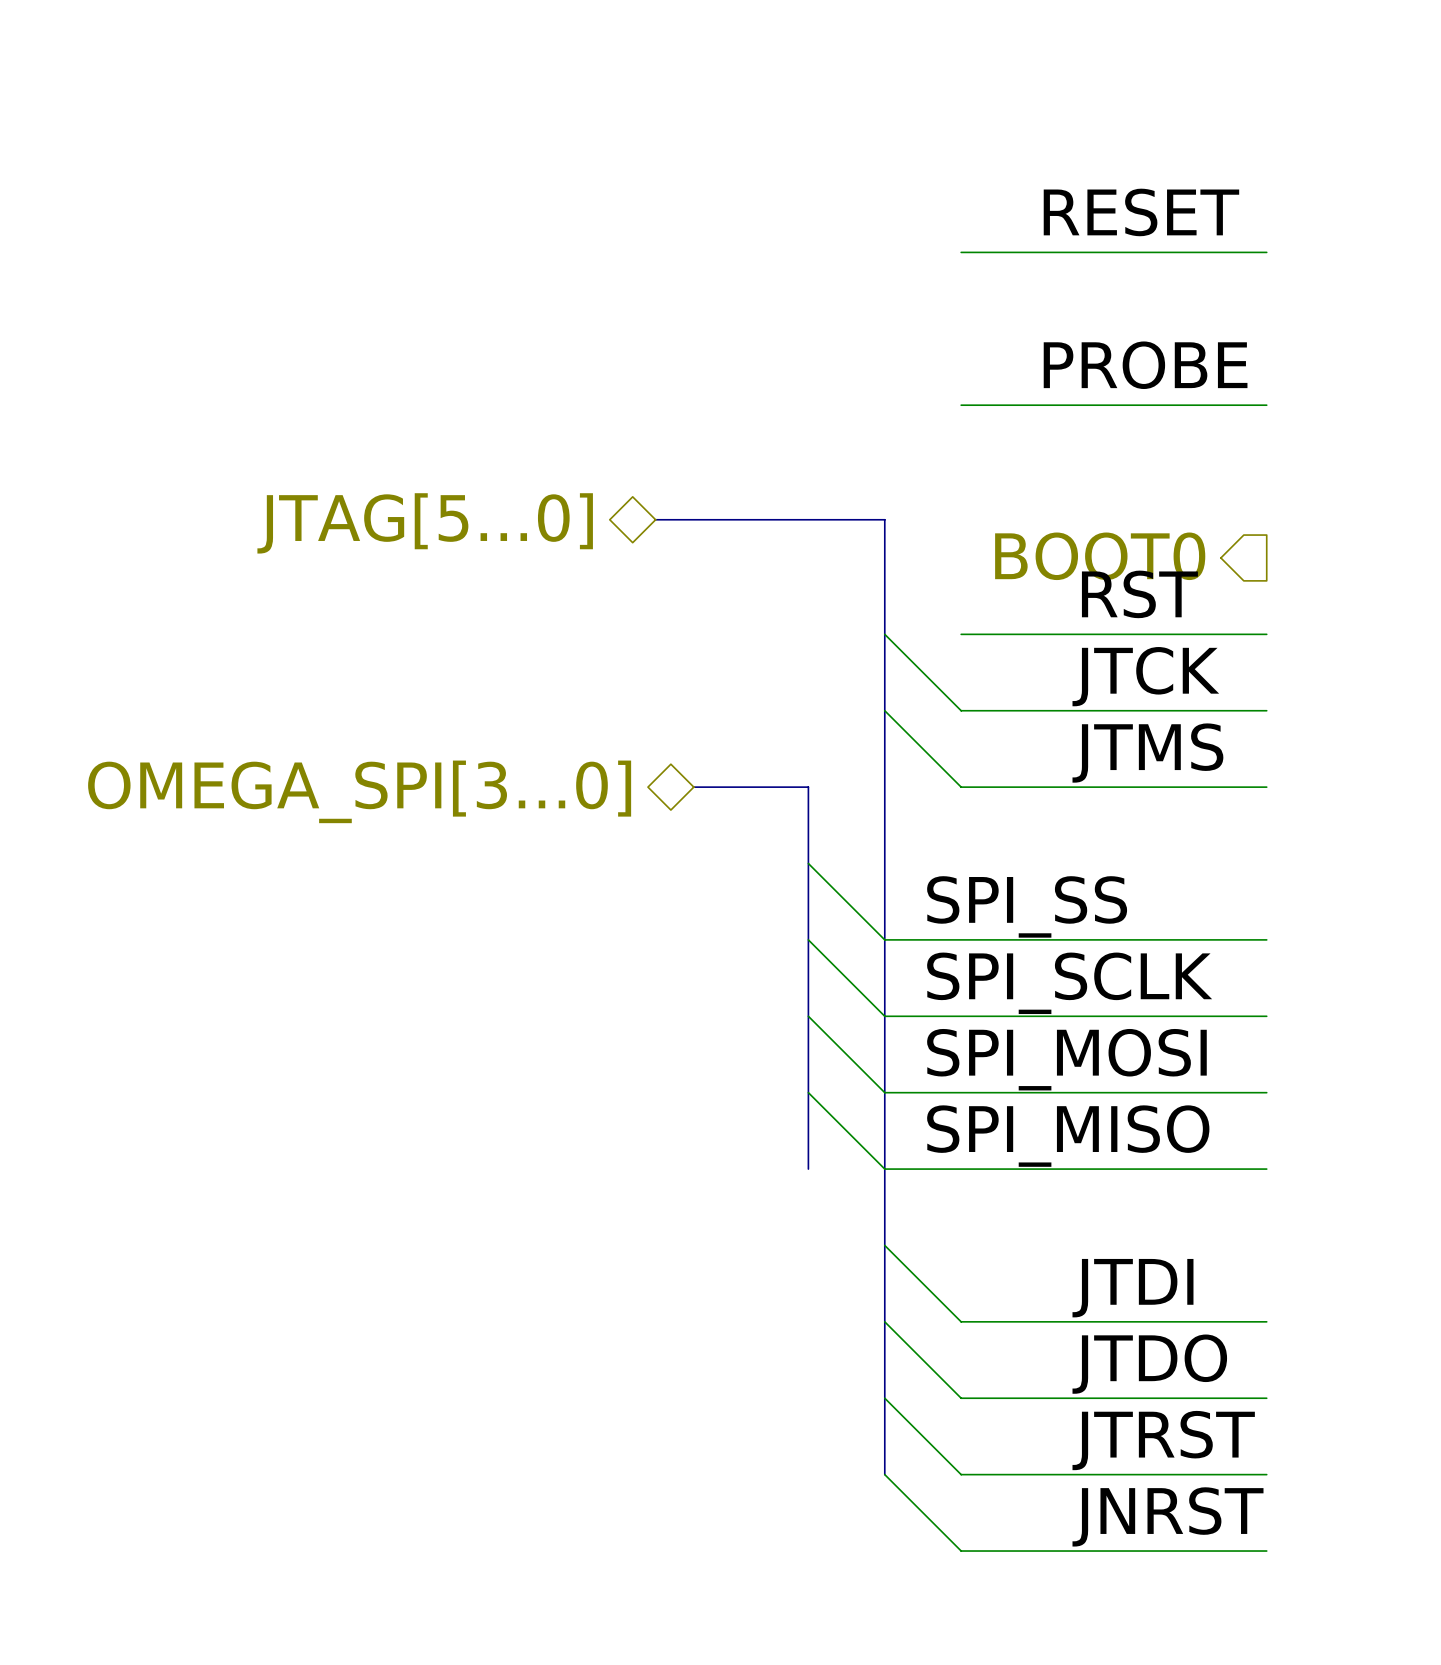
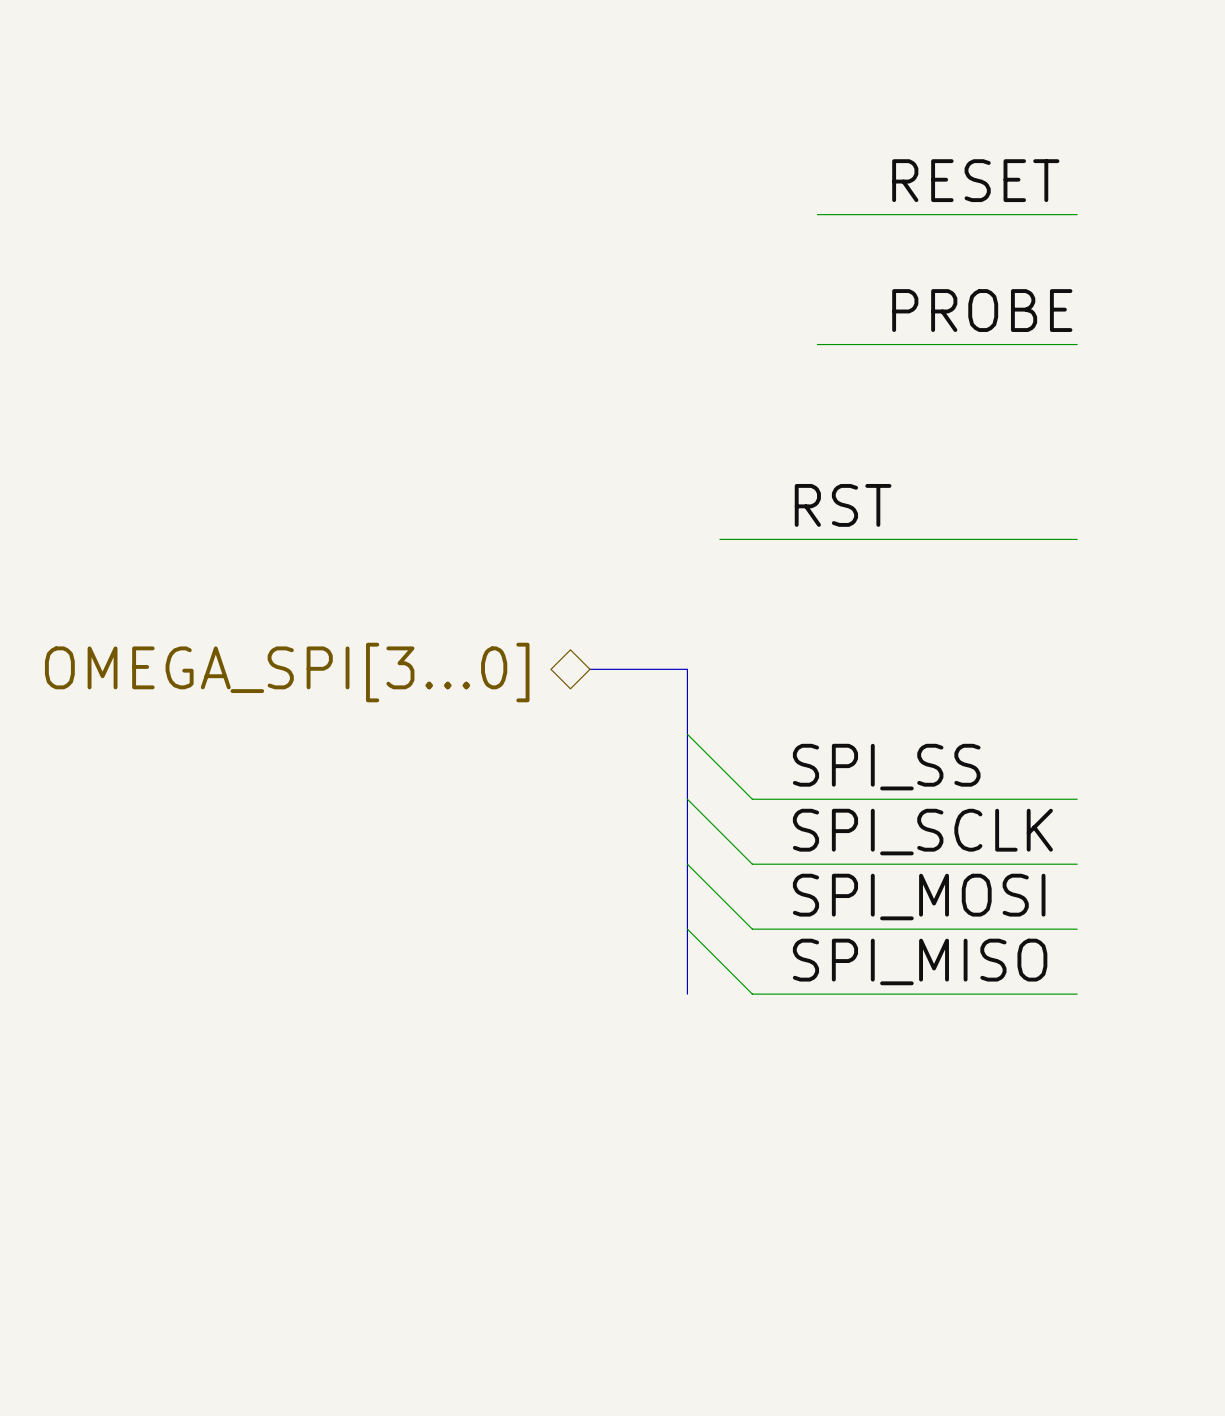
bus: (655, 519) (884, 519) (884, 1474) -> none
hierarchical label: JTAG[5...0] (425, 523) -> none
hierarchical label: BOOT0 (1100, 556) -> none
label position: RST (1139, 594) -> RST (843, 505)
wire: none -> (719, 539) (817, 539)
wire: (884, 634) (961, 710) (1266, 710) -> none
label: JTCK (1145, 676) -> none
wire: (884, 710) (961, 787) (1266, 787) -> none
label: JTMS (1147, 753) -> none
wire: (884, 1245) (961, 1321) (1266, 1321) -> none
label: JTDI (1132, 1288) -> none
wire: (884, 1321) (961, 1398) (1266, 1398) -> none
label: JTDO (1149, 1364) -> none
wire: (884, 1398) (961, 1474) (1266, 1474) -> none
label: JTRST (1163, 1440) -> none
wire: (884, 1474) (961, 1551) (1266, 1551) -> none
label: JNRST (1168, 1516) -> none

